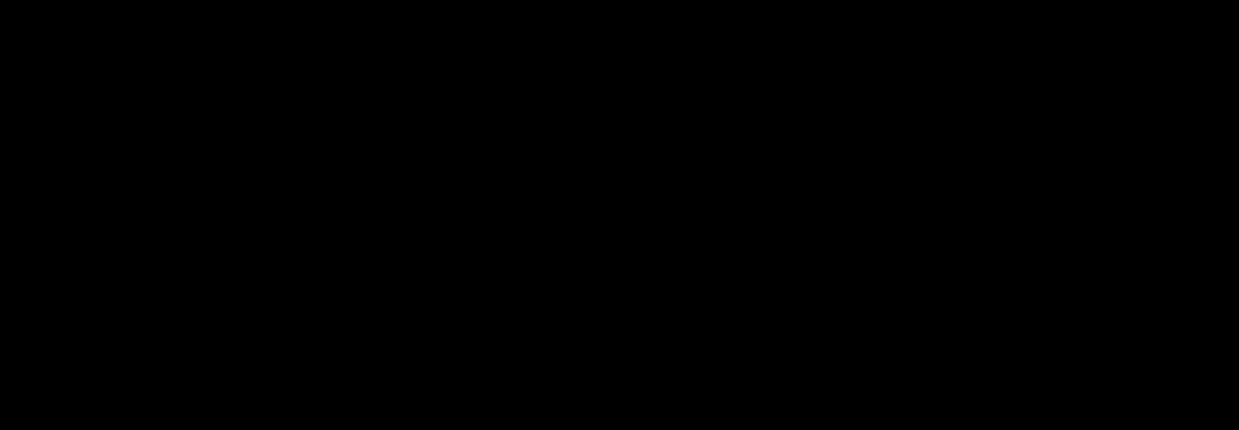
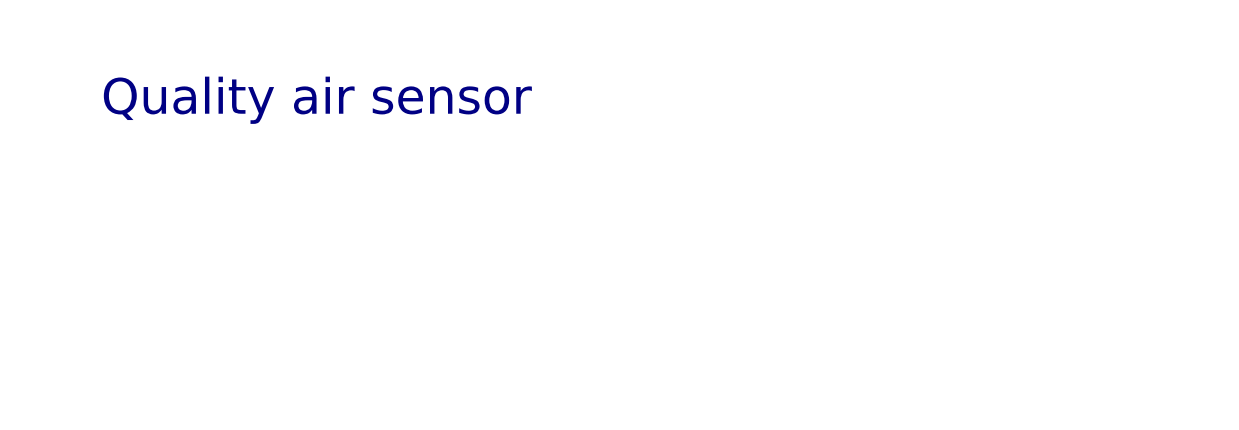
text: none -> Quality air sensor (317, 100)

